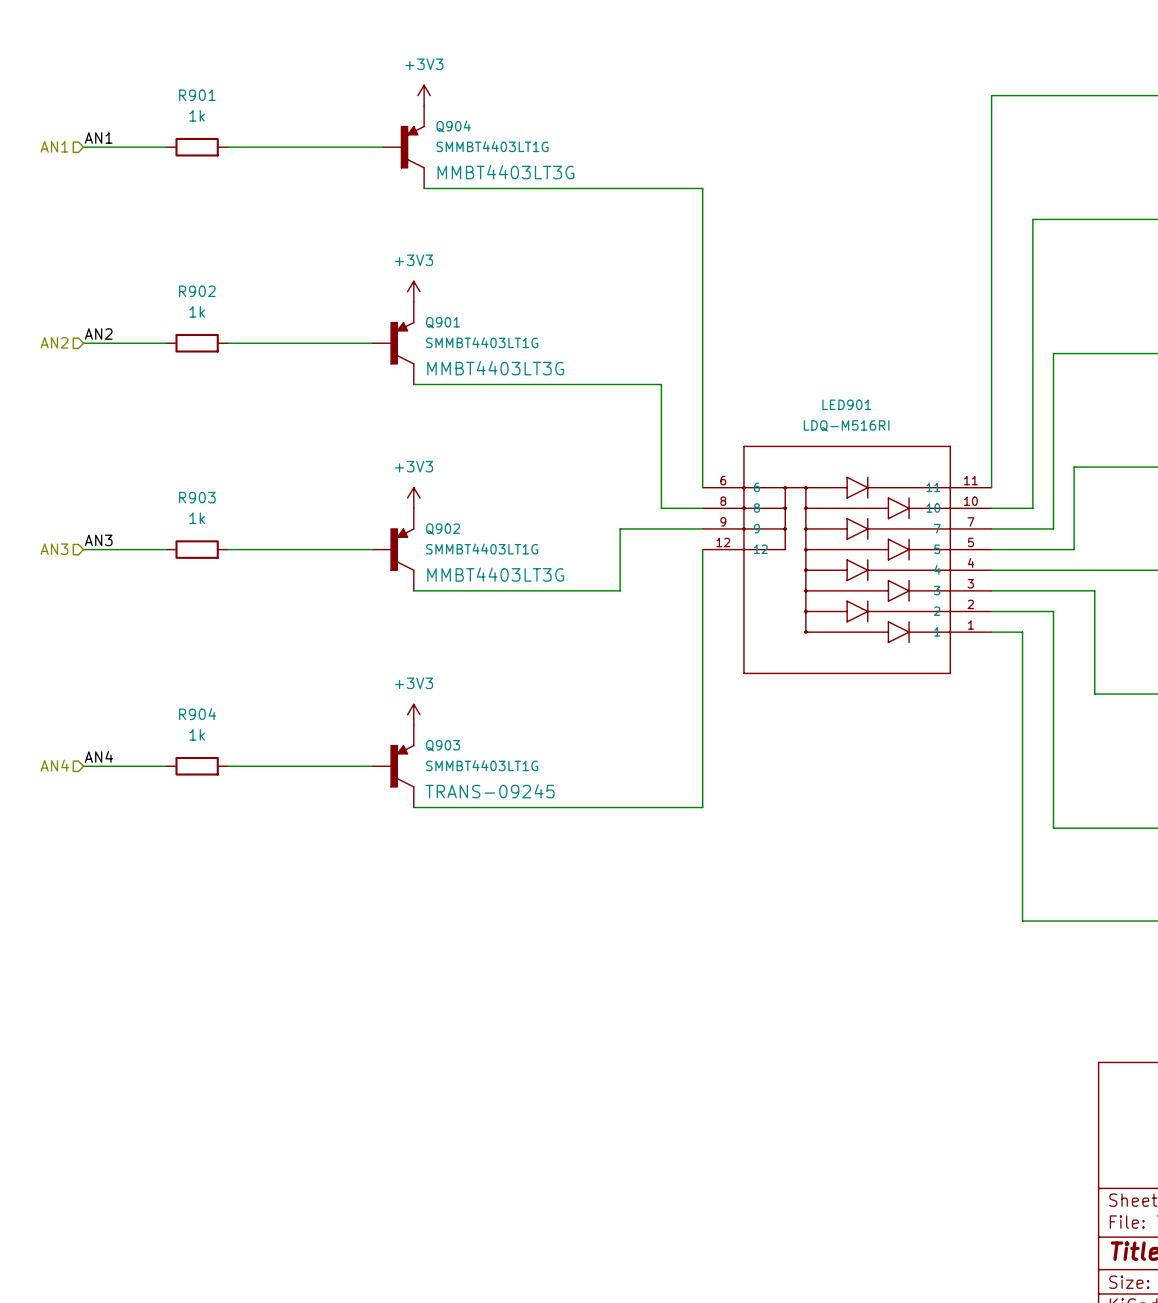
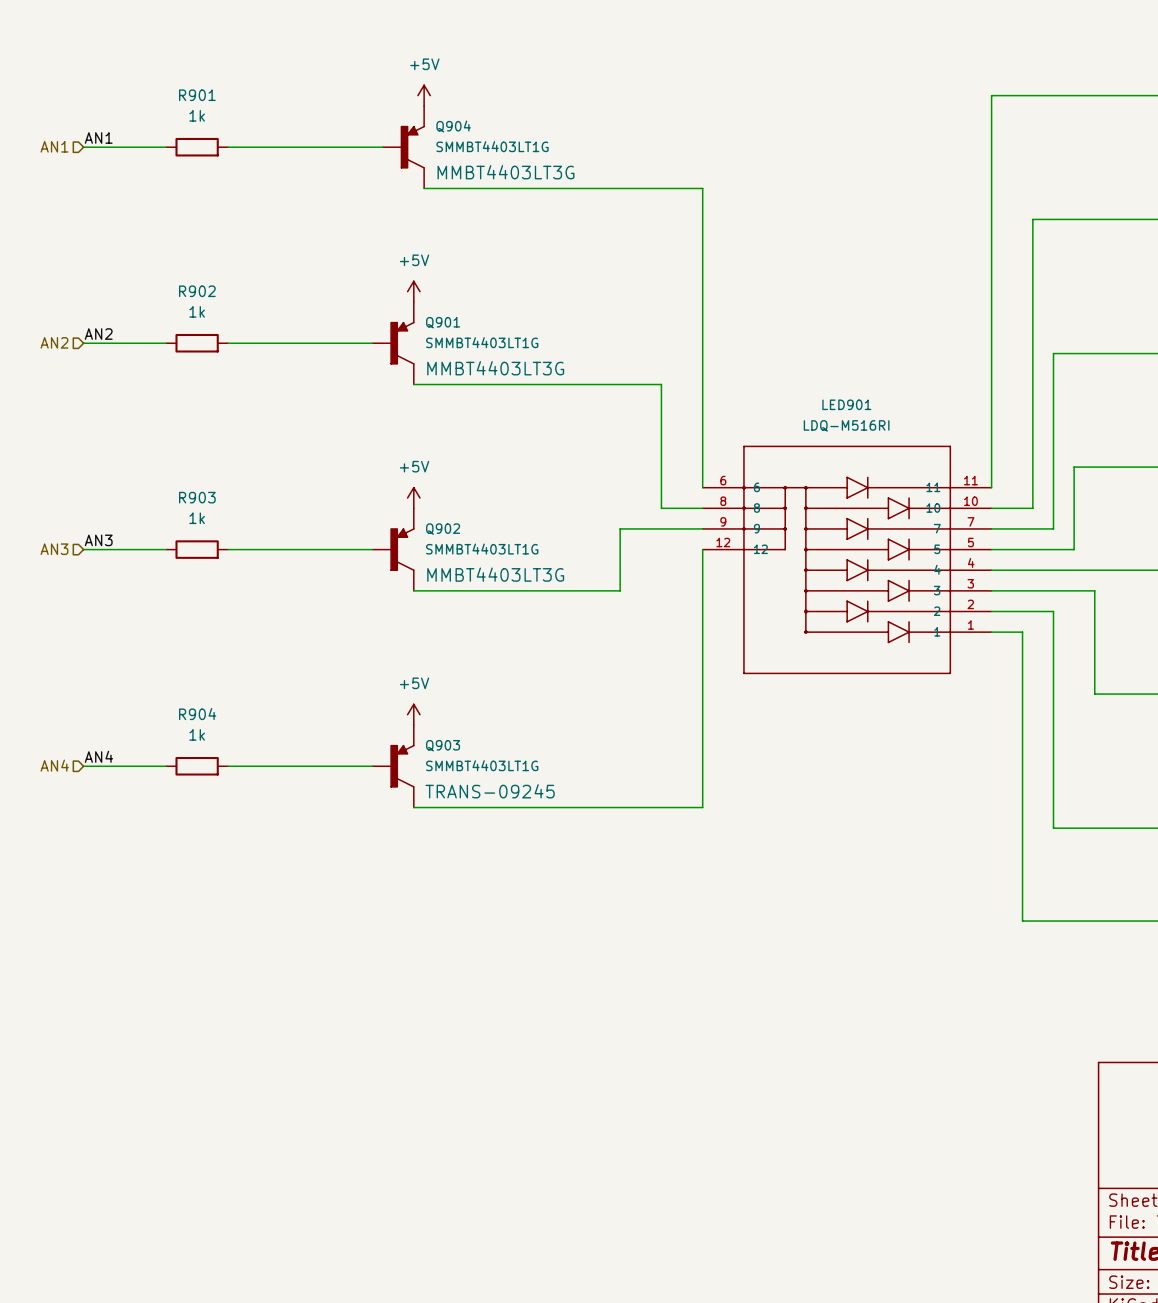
power symbol: +3V3 (424, 95) -> +5V (424, 95)
power symbol: +3V3 (413, 291) -> +5V (413, 291)
power symbol: +3V3 (413, 498) -> +5V (413, 498)
power symbol: +3V3 (413, 714) -> +5V (413, 714)

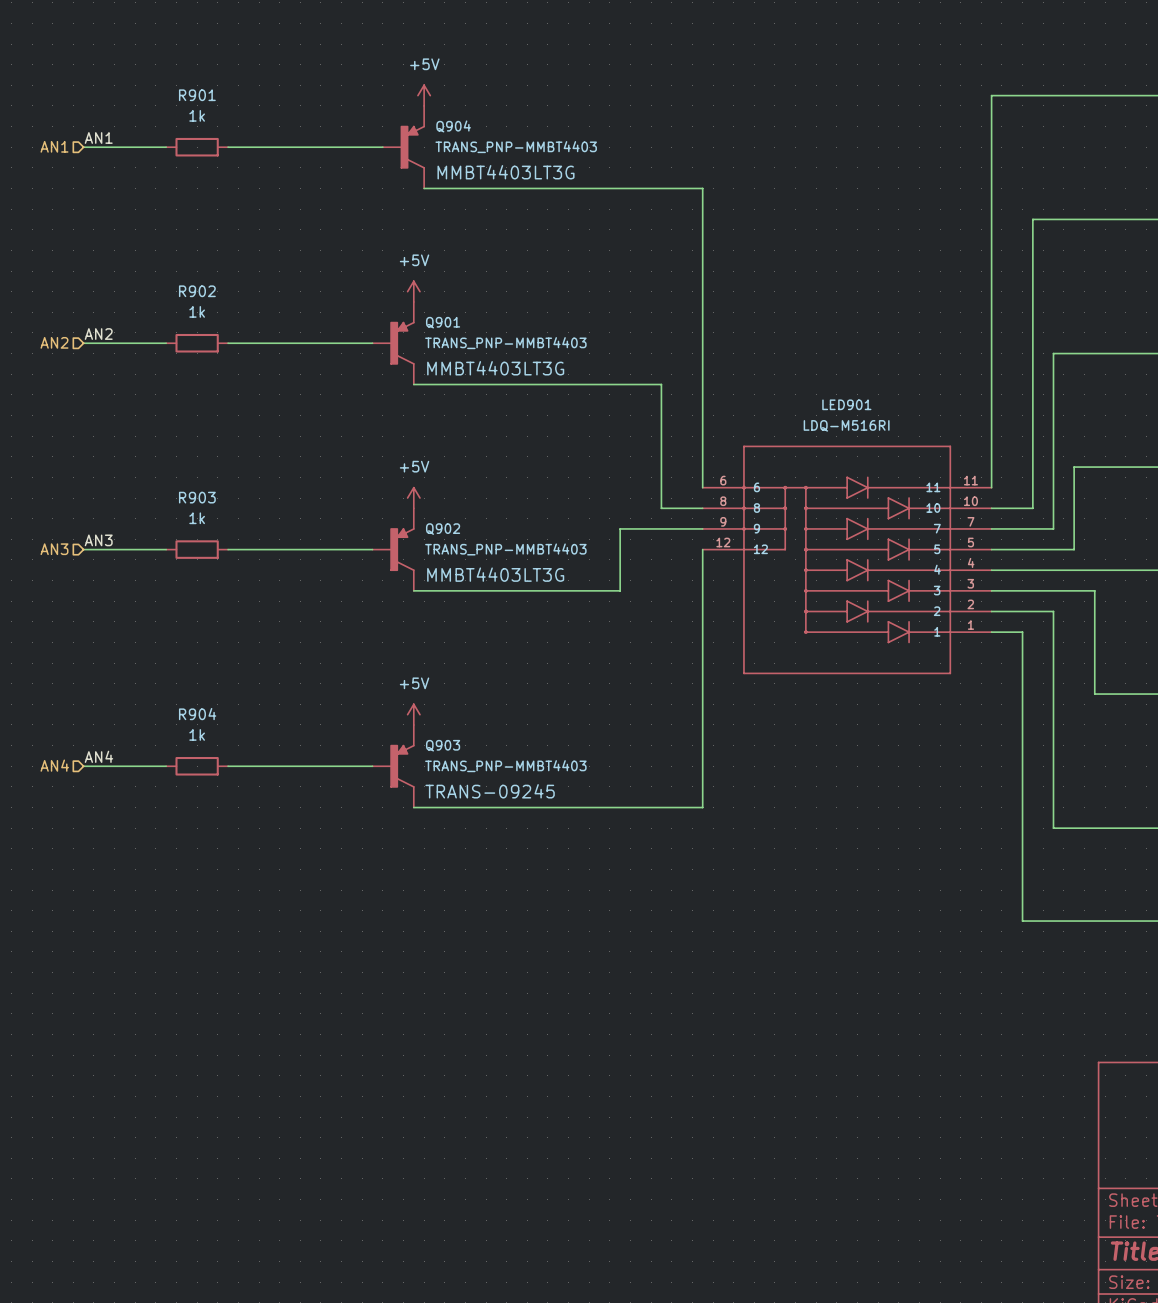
Q904 value: SMMBT4403LT1G (492, 146) -> TRANS_PNP-MMBT4403 (516, 147)
Q901 value: SMMBT4403LT1G (482, 342) -> TRANS_PNP-MMBT4403 (505, 343)
Q902 value: SMMBT4403LT1G (482, 549) -> TRANS_PNP-MMBT4403 (505, 549)
Q903 value: SMMBT4403LT1G (482, 765) -> TRANS_PNP-MMBT4403 (505, 766)

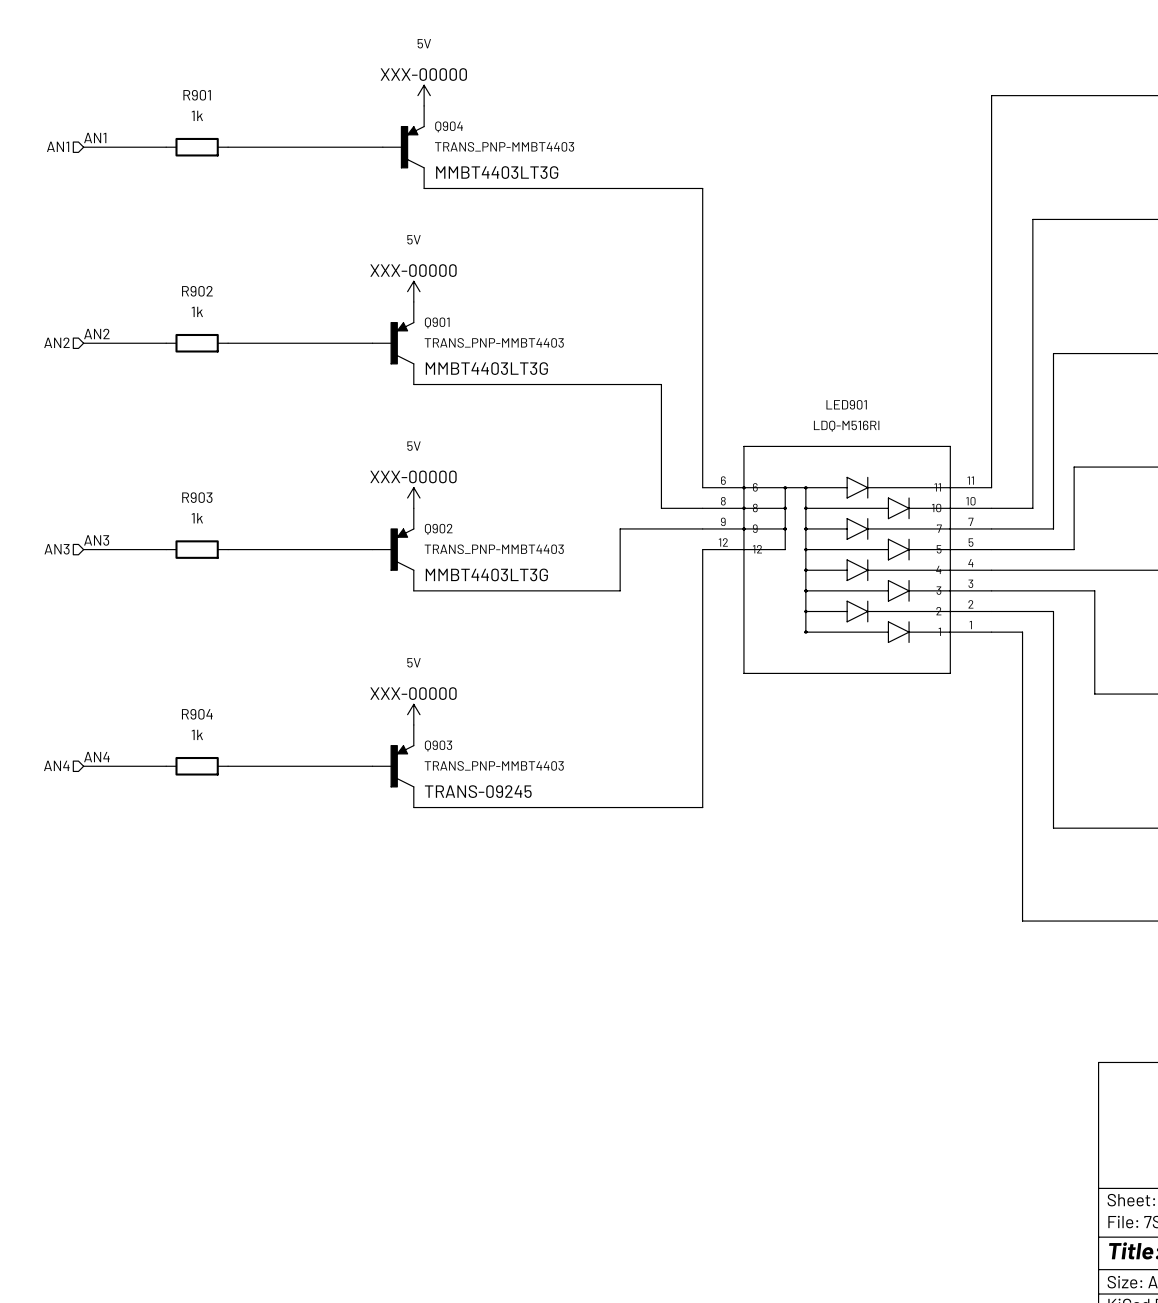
power symbol: +5V (424, 95) -> 5V (424, 95)
power symbol: +5V (413, 291) -> 5V (413, 291)
power symbol: +5V (413, 498) -> 5V (413, 498)
power symbol: +5V (413, 714) -> 5V (413, 714)

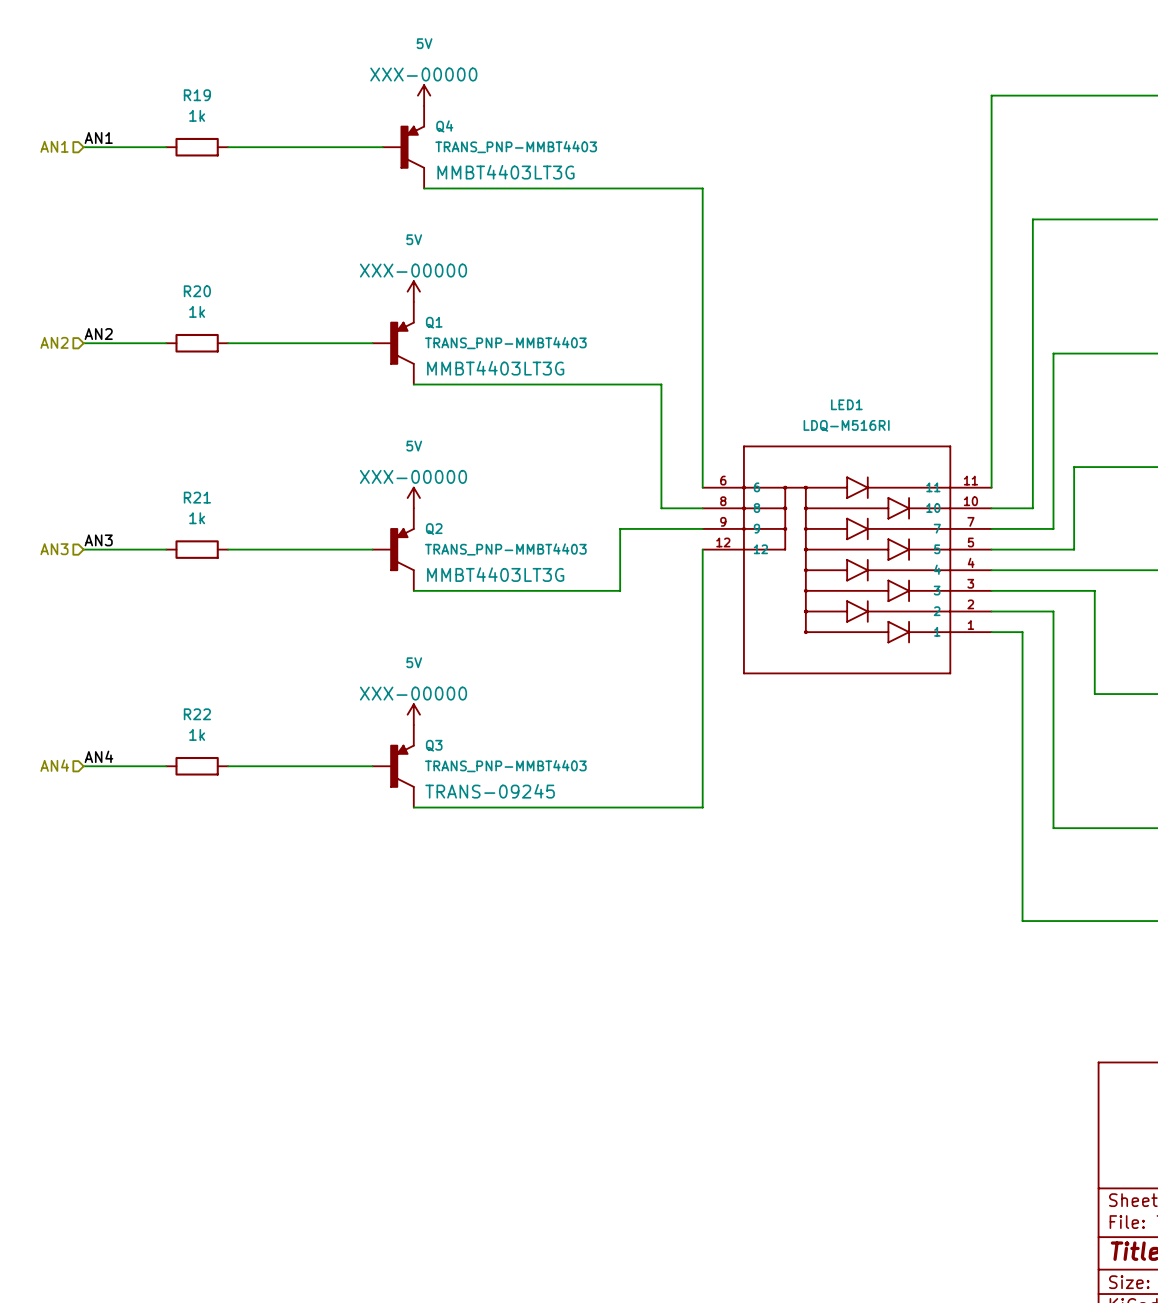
R901 name: R901 (197, 95) -> R19 (197, 95)
Q904 name: Q904 (449, 126) -> Q4 (444, 126)
R902 name: R902 (197, 291) -> R20 (197, 291)
Q901 name: Q901 (437, 322) -> Q1 (434, 322)
LED901 name: LED901 (846, 404) -> LED1 (846, 404)
R903 name: R903 (197, 497) -> R21 (197, 497)
Q902 name: Q902 (438, 529) -> Q2 (434, 529)
R904 name: R904 (197, 714) -> R22 (197, 714)
Q903 name: Q903 (438, 745) -> Q3 (434, 745)

